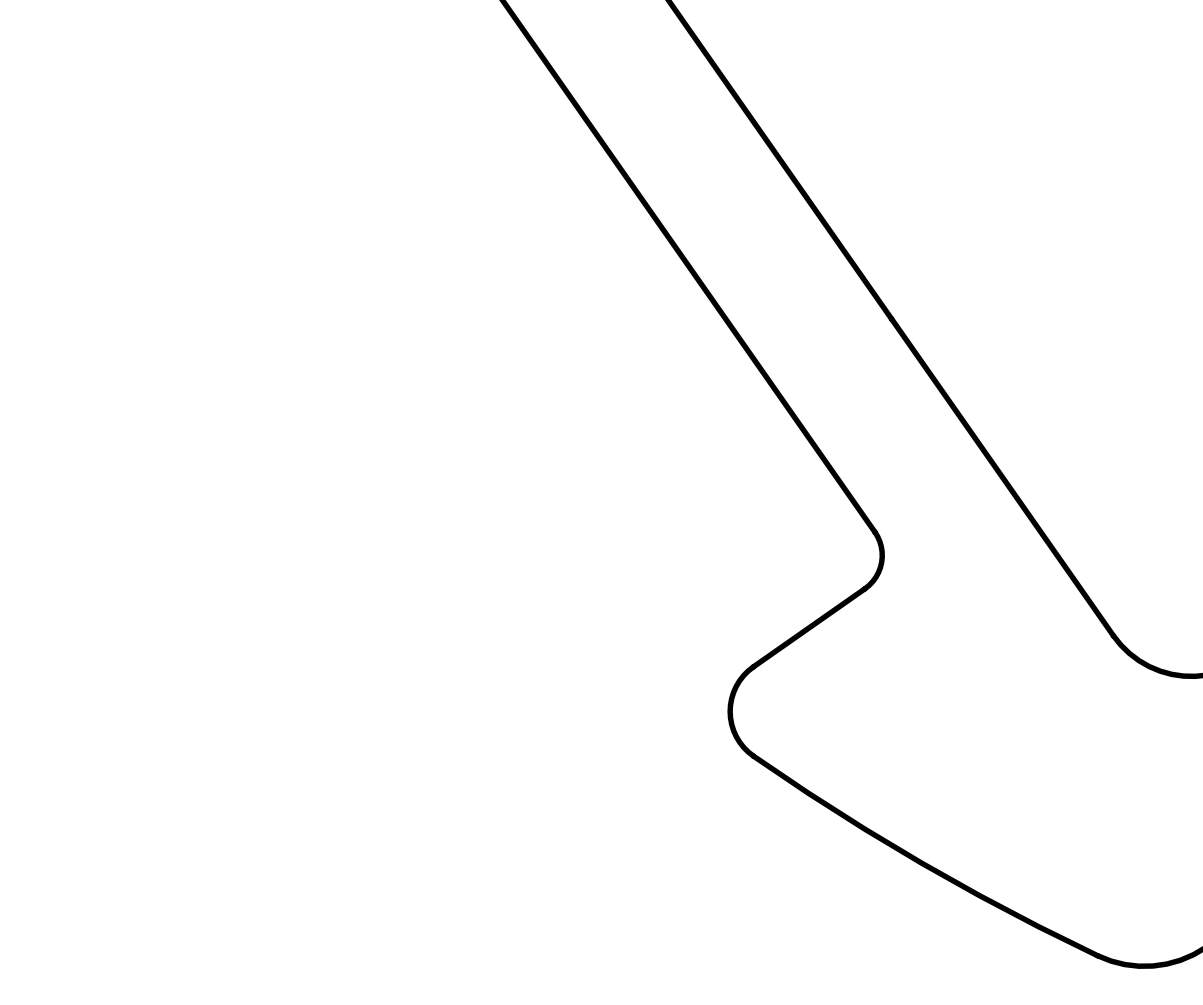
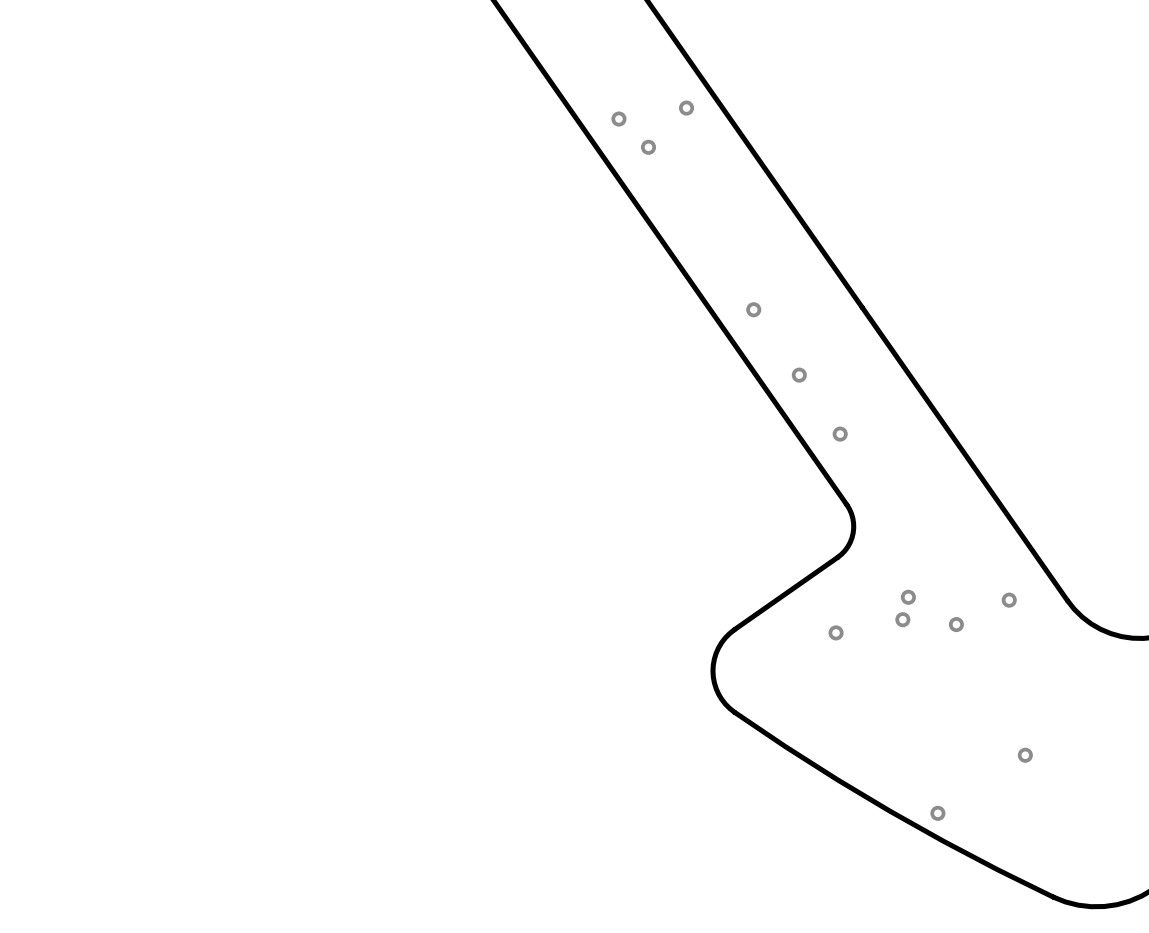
via: none -> (686, 108)
via: none -> (618, 119)
via: none -> (648, 147)
via: none -> (753, 309)
via: none -> (799, 375)
via: none -> (840, 434)
via: none -> (908, 597)
via: none -> (1009, 600)
via: none -> (902, 619)
via: none -> (956, 624)
via: none -> (836, 632)
via: none -> (1025, 755)
via: none -> (937, 813)

